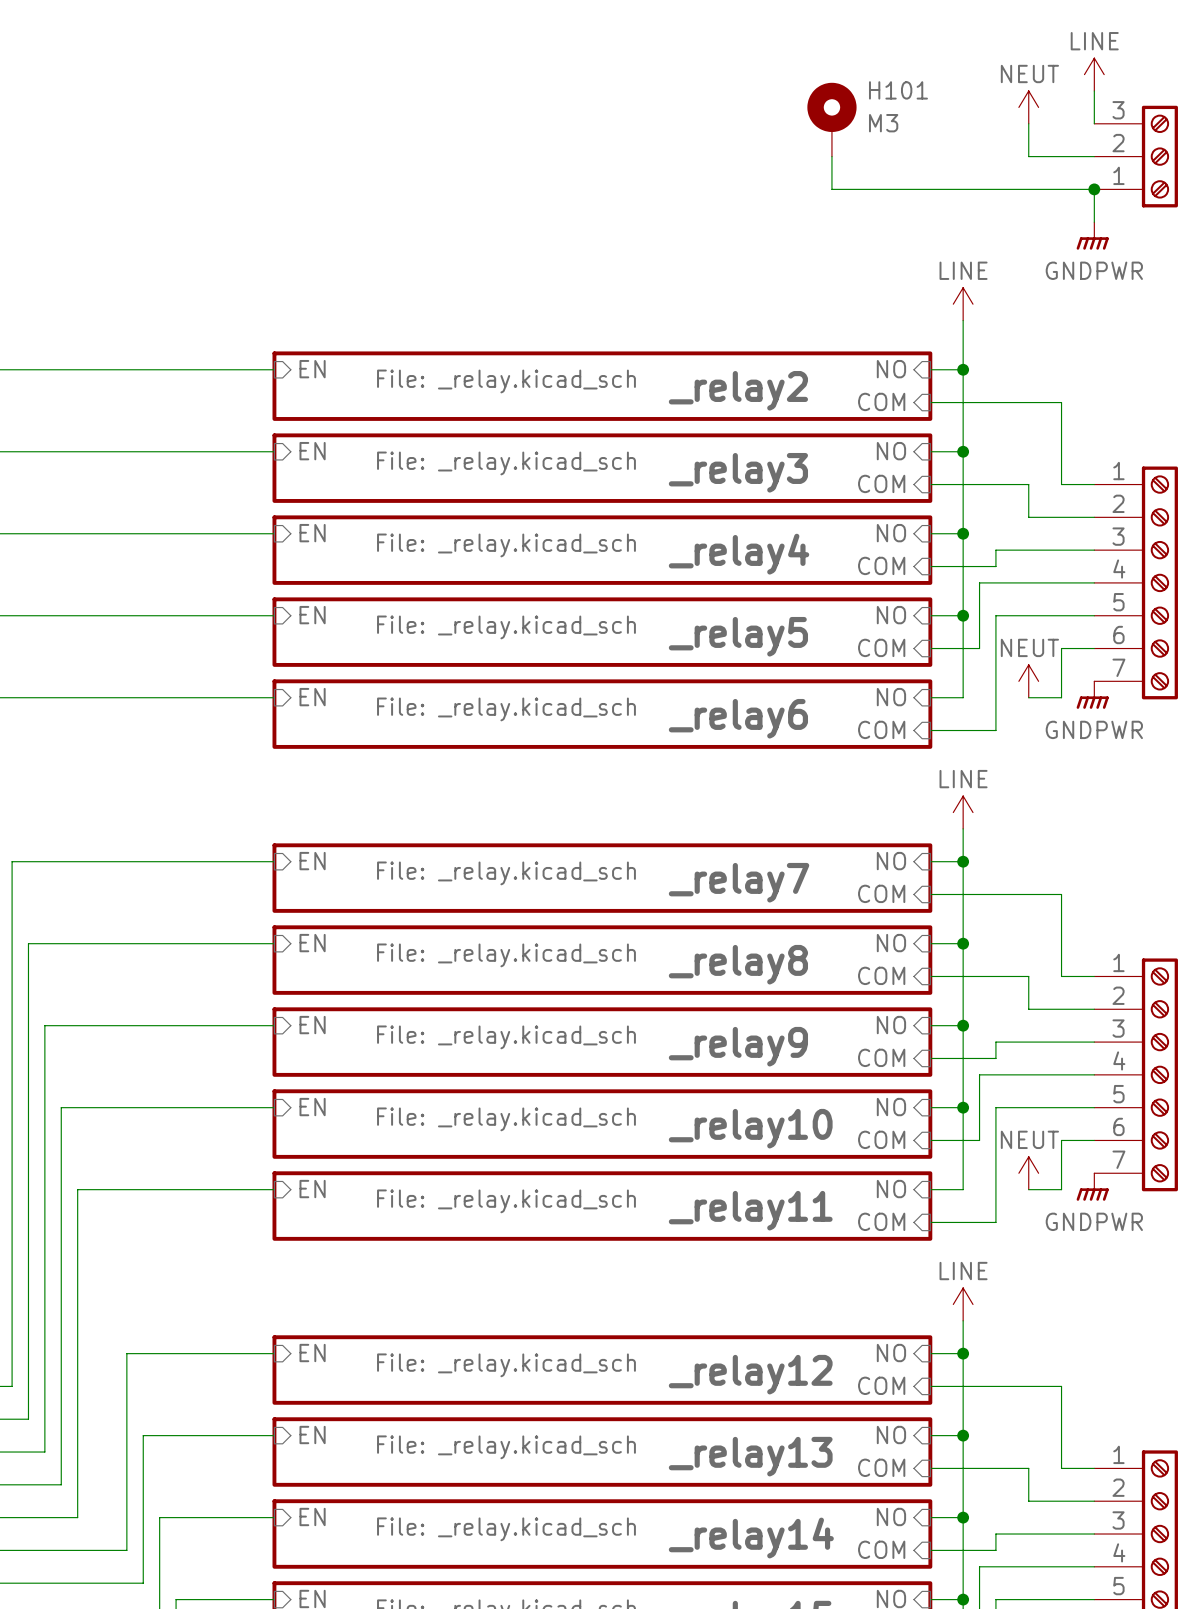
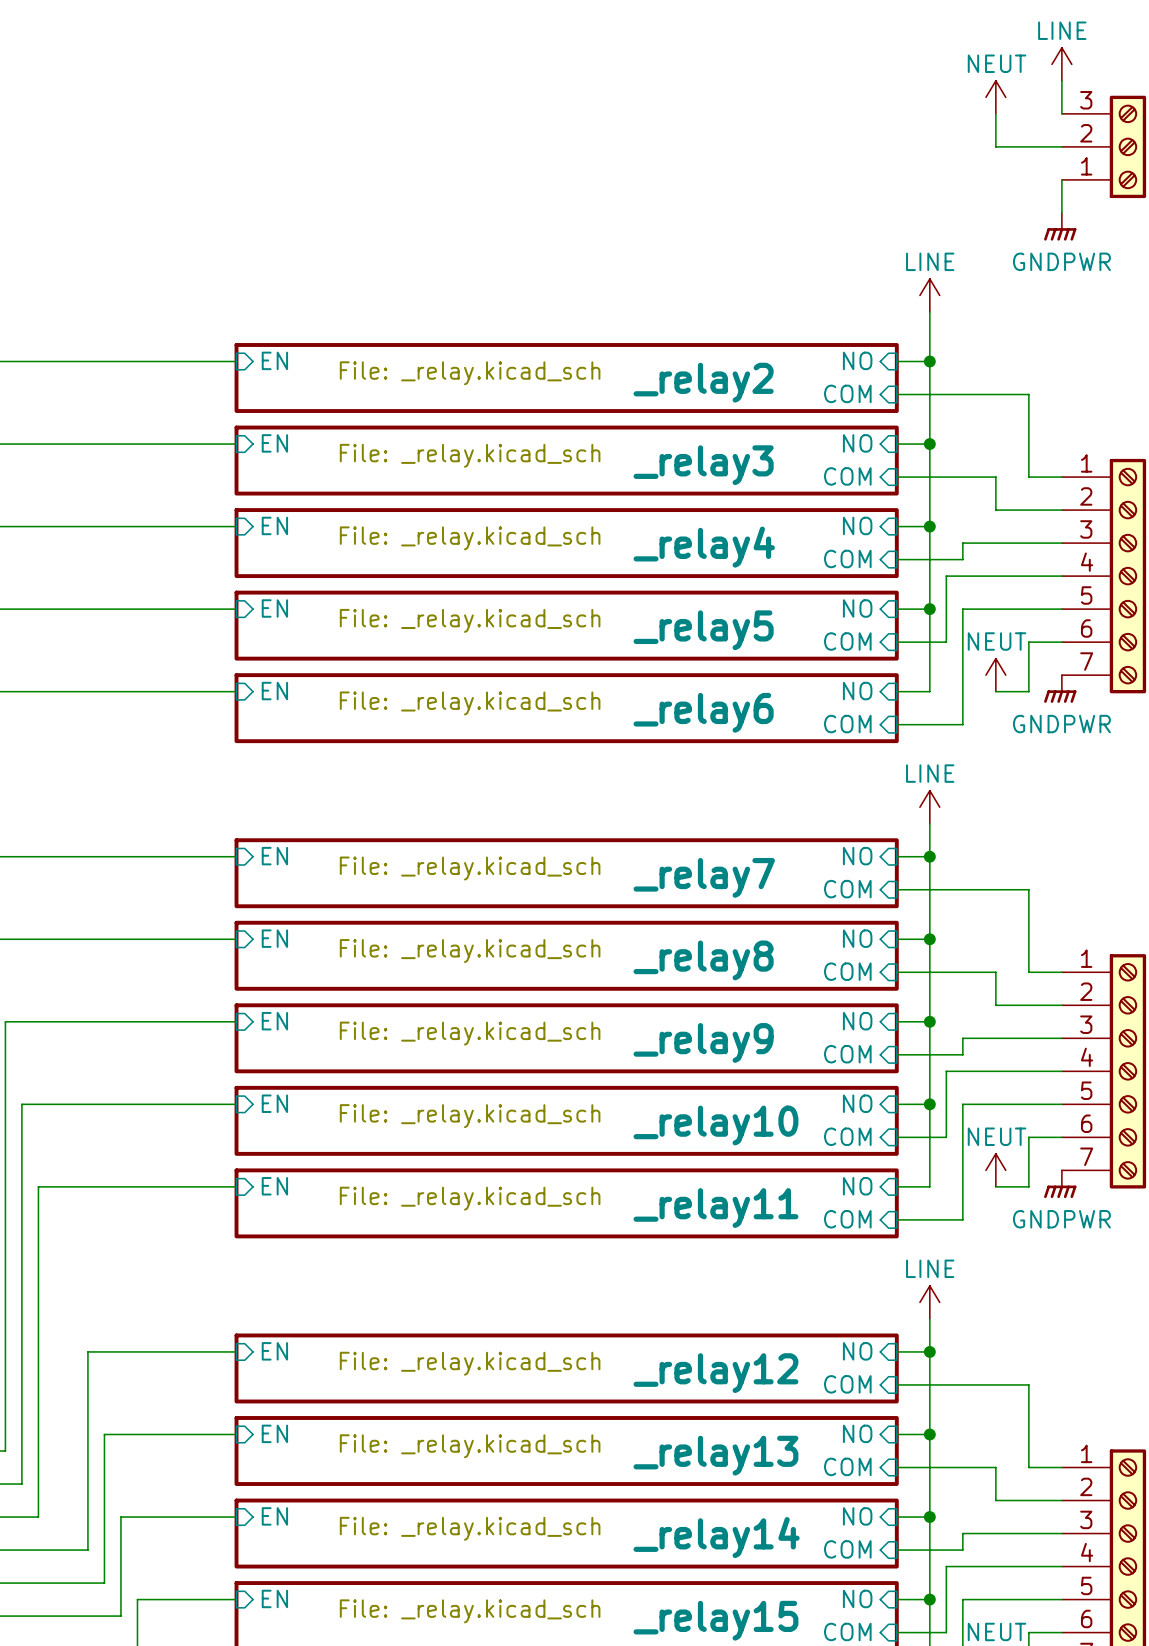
H101: M3 (831, 119) -> none
wire: (831, 156) (831, 189) (1094, 189) -> none
junction: (1094, 189) -> none

